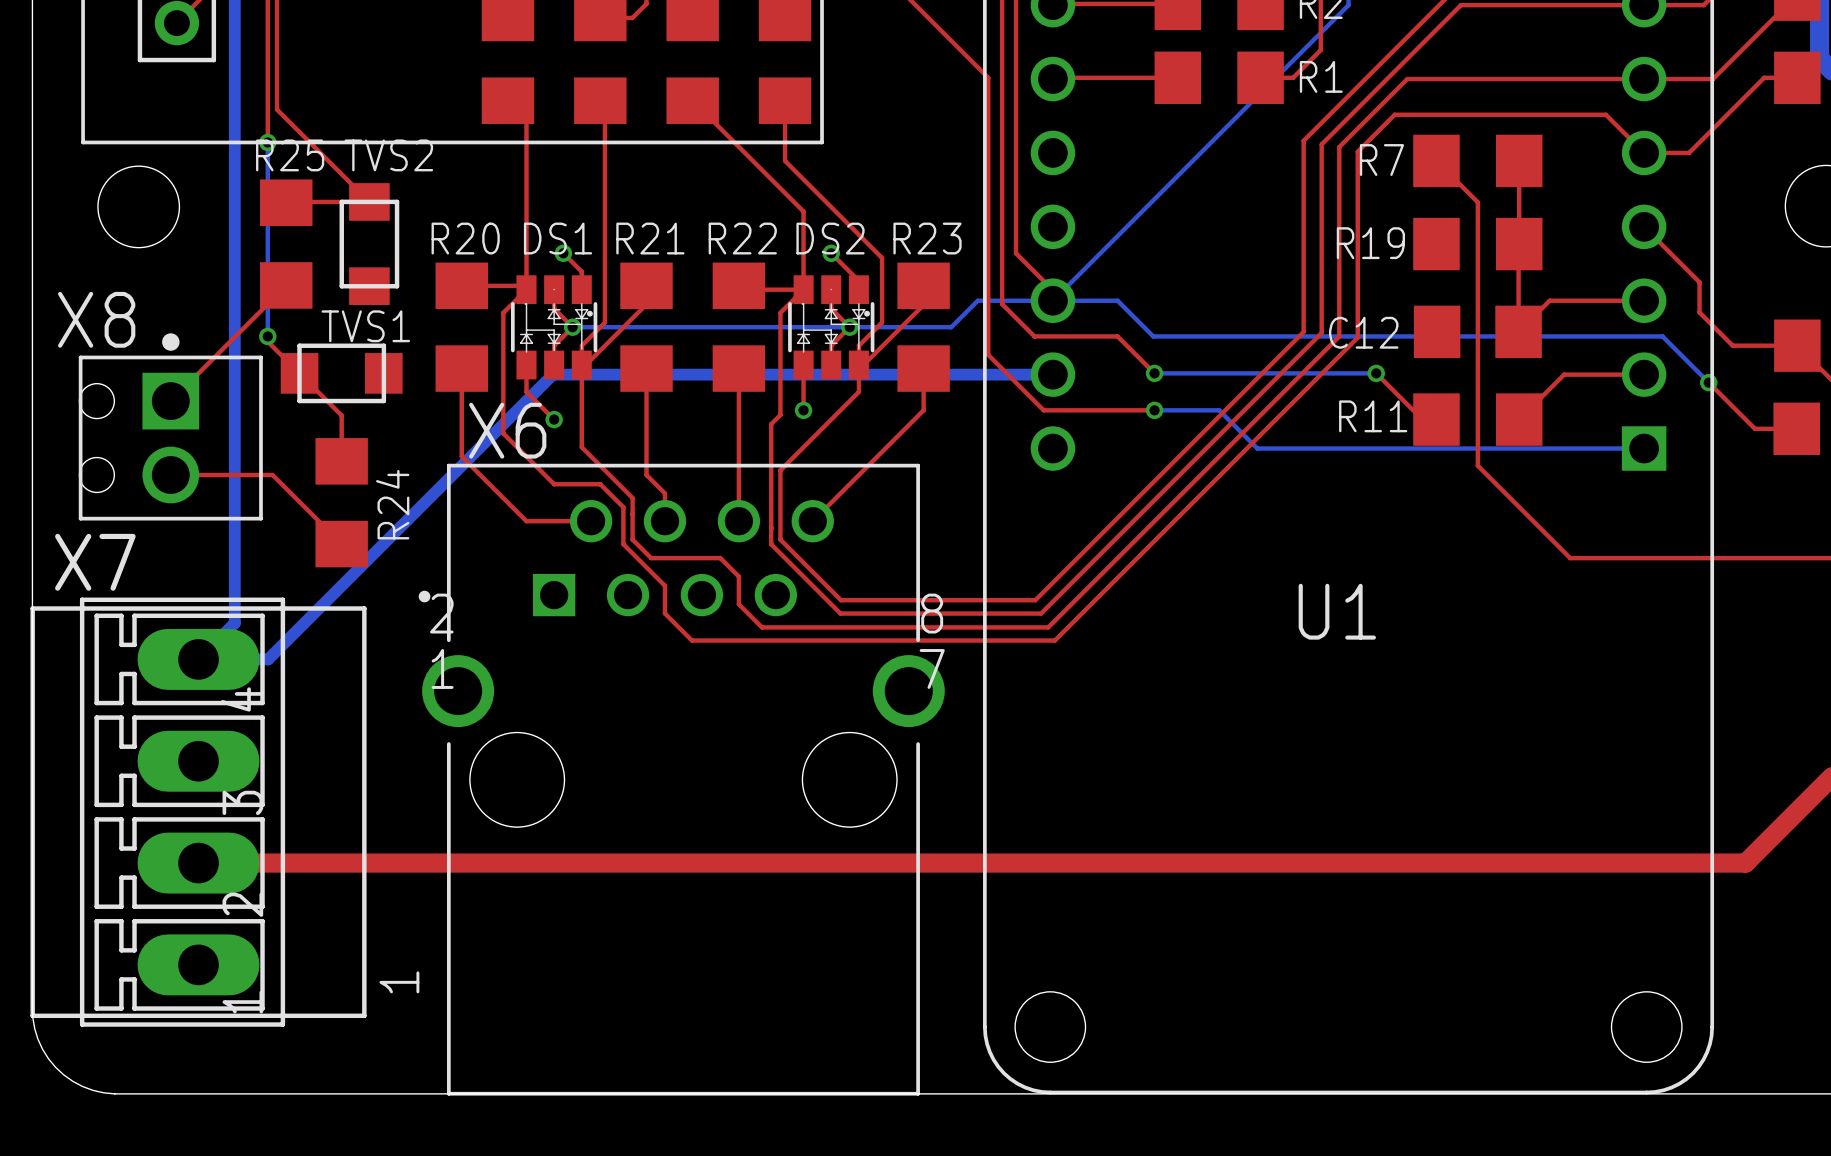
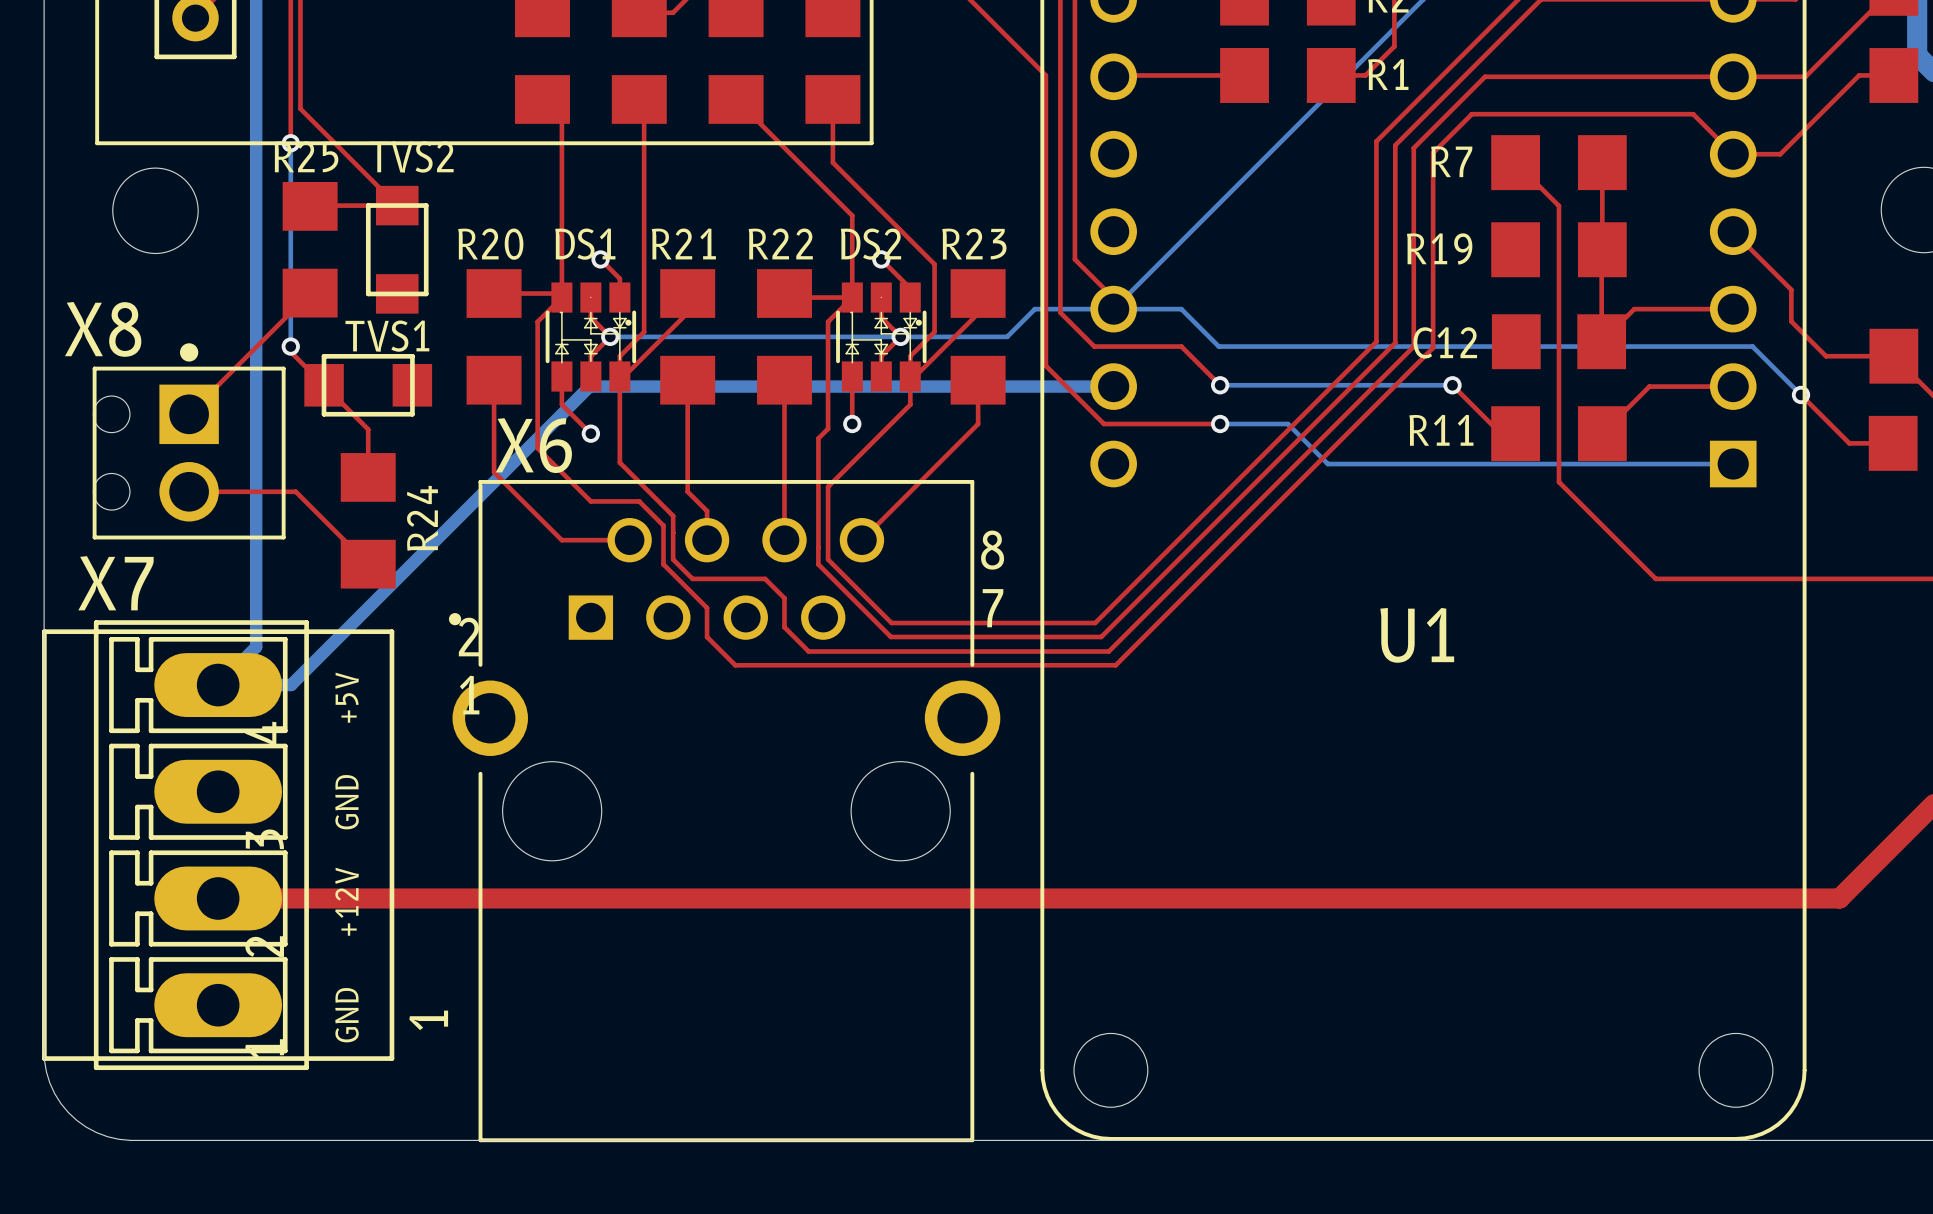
text position: 8 (932, 613) -> 8 (992, 550)
text: none -> +5V (347, 697)
text position: 7 (932, 668) -> 7 (993, 608)
text: none -> GND (347, 802)
text: none -> +12V (347, 901)
text: none -> GND (347, 1015)

